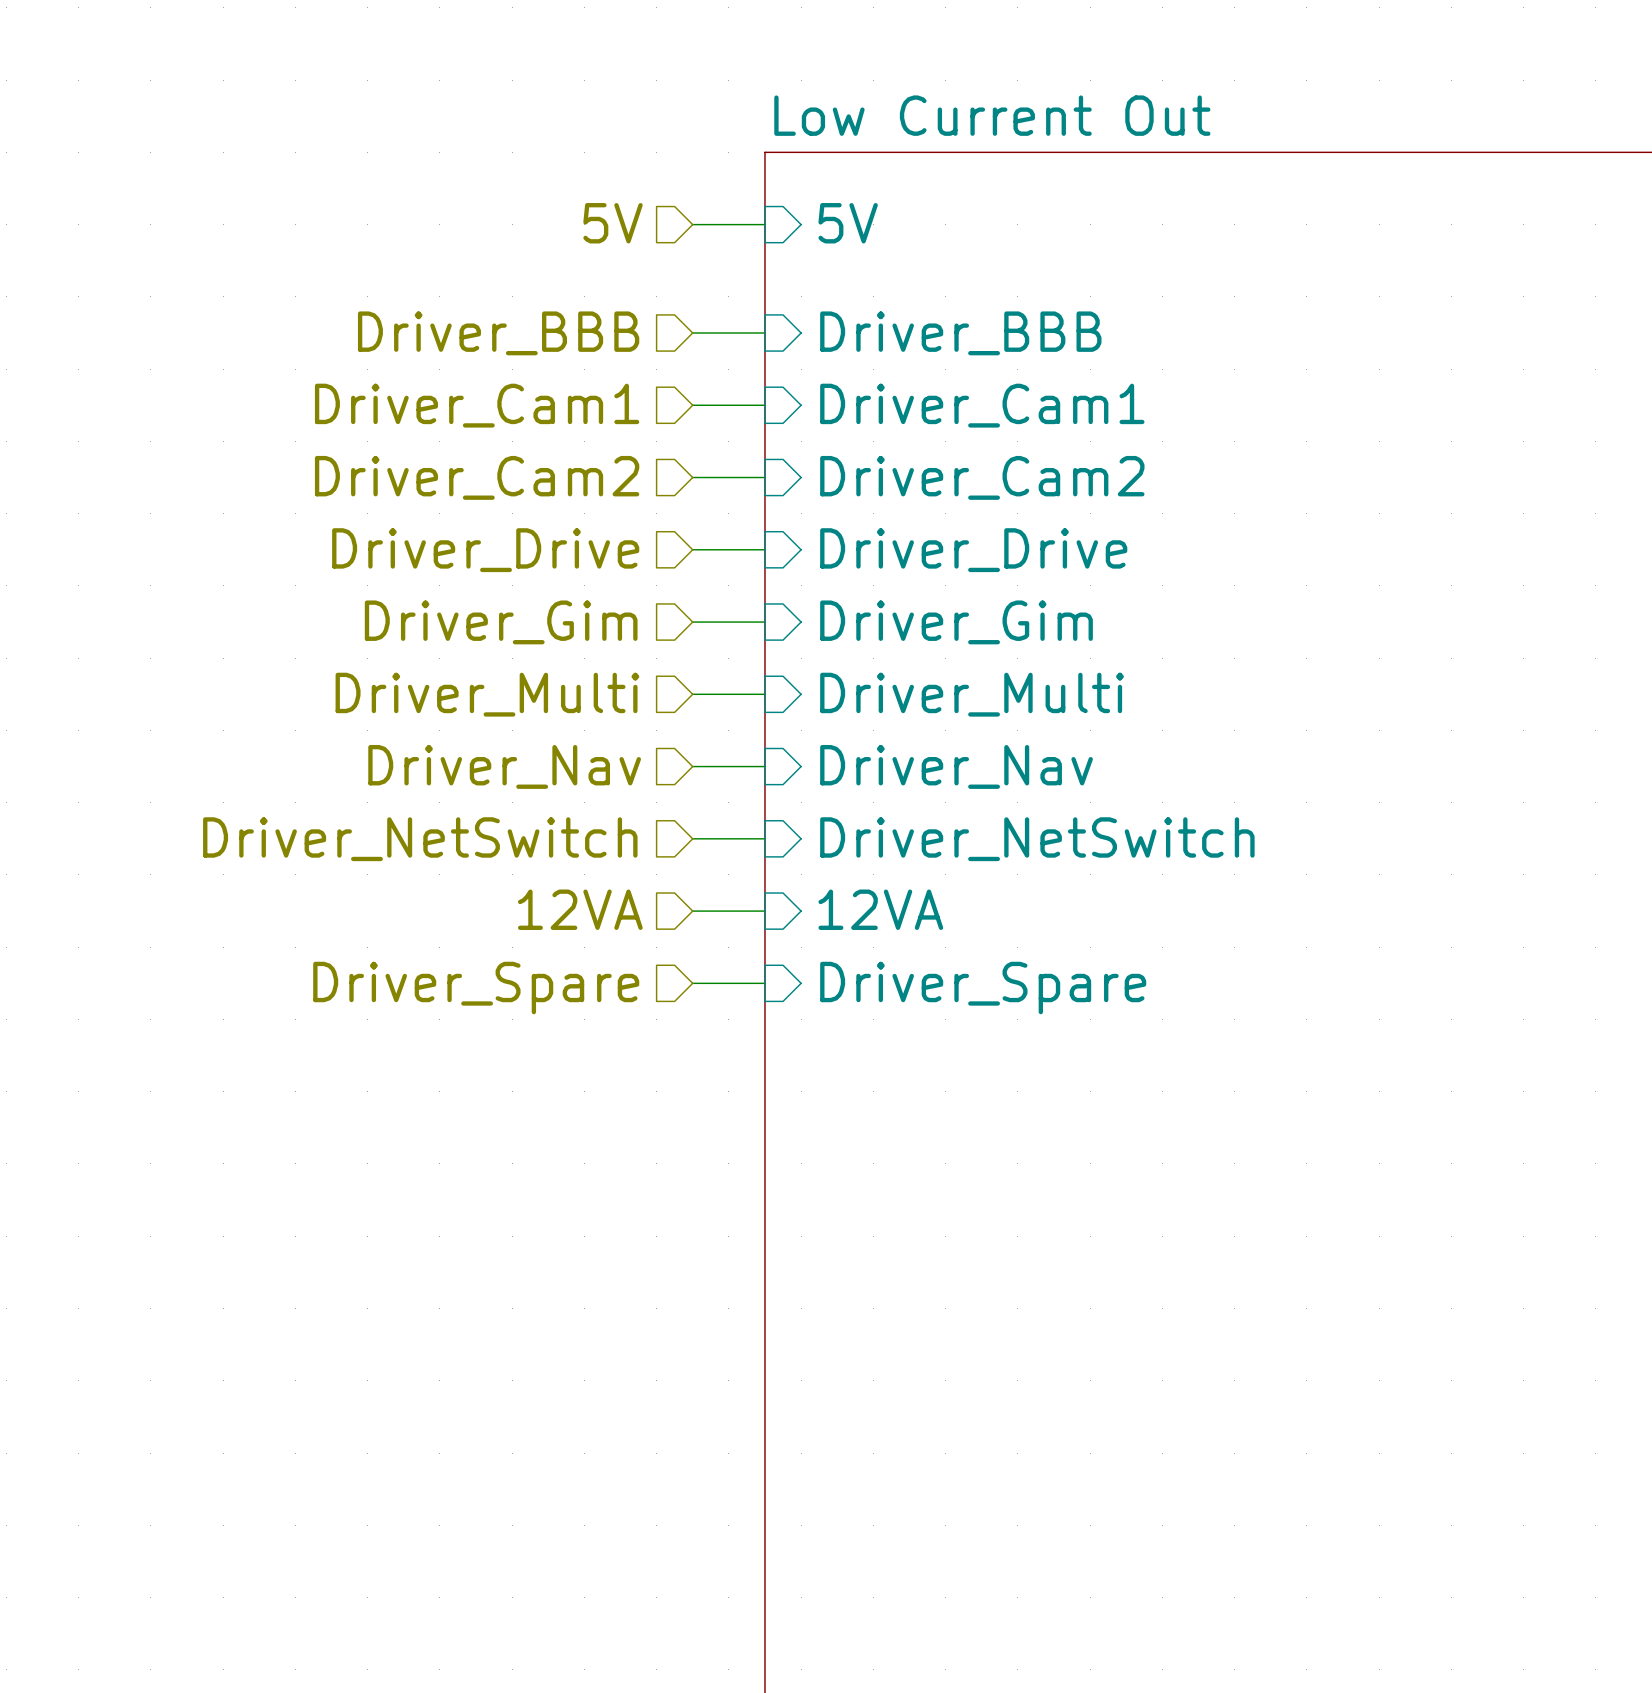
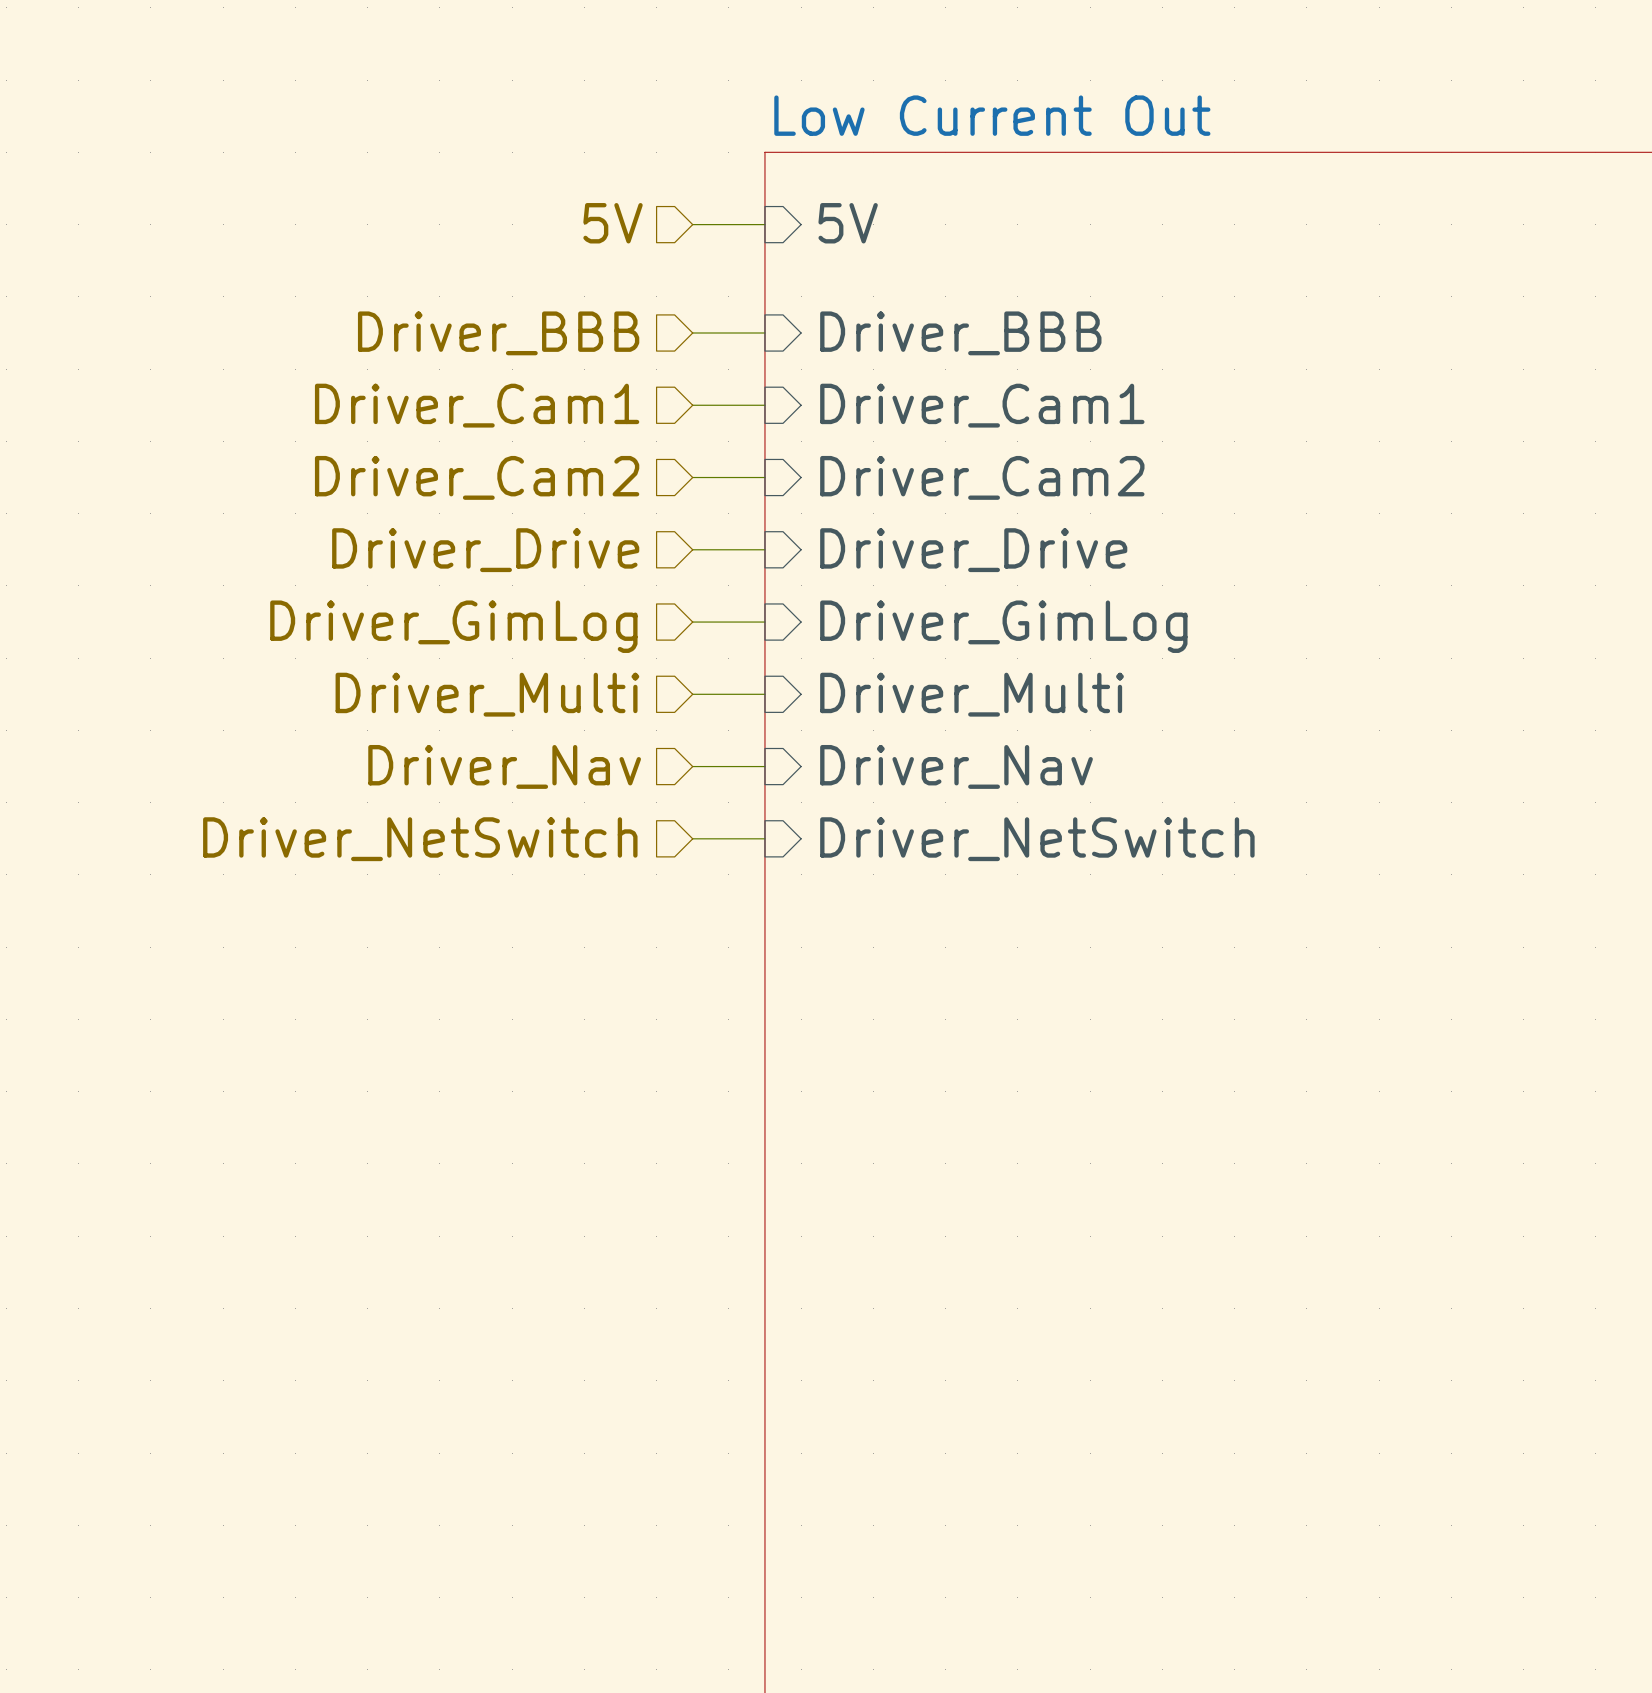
hierarchical label: Driver_Gim (501, 622) -> Driver_GimLog (453, 626)
sheet pin: Driver_Gim (956, 622) -> Driver_GimLog (1003, 626)
hierarchical label: 12VA (580, 909) -> none
sheet pin: 12VA (880, 909) -> none
wire: (692, 911) (764, 911) -> none
wire: (692, 983) (764, 983) -> none
hierarchical label: Driver_Spare (476, 988) -> none
sheet pin: Driver_Spare (983, 988) -> none

